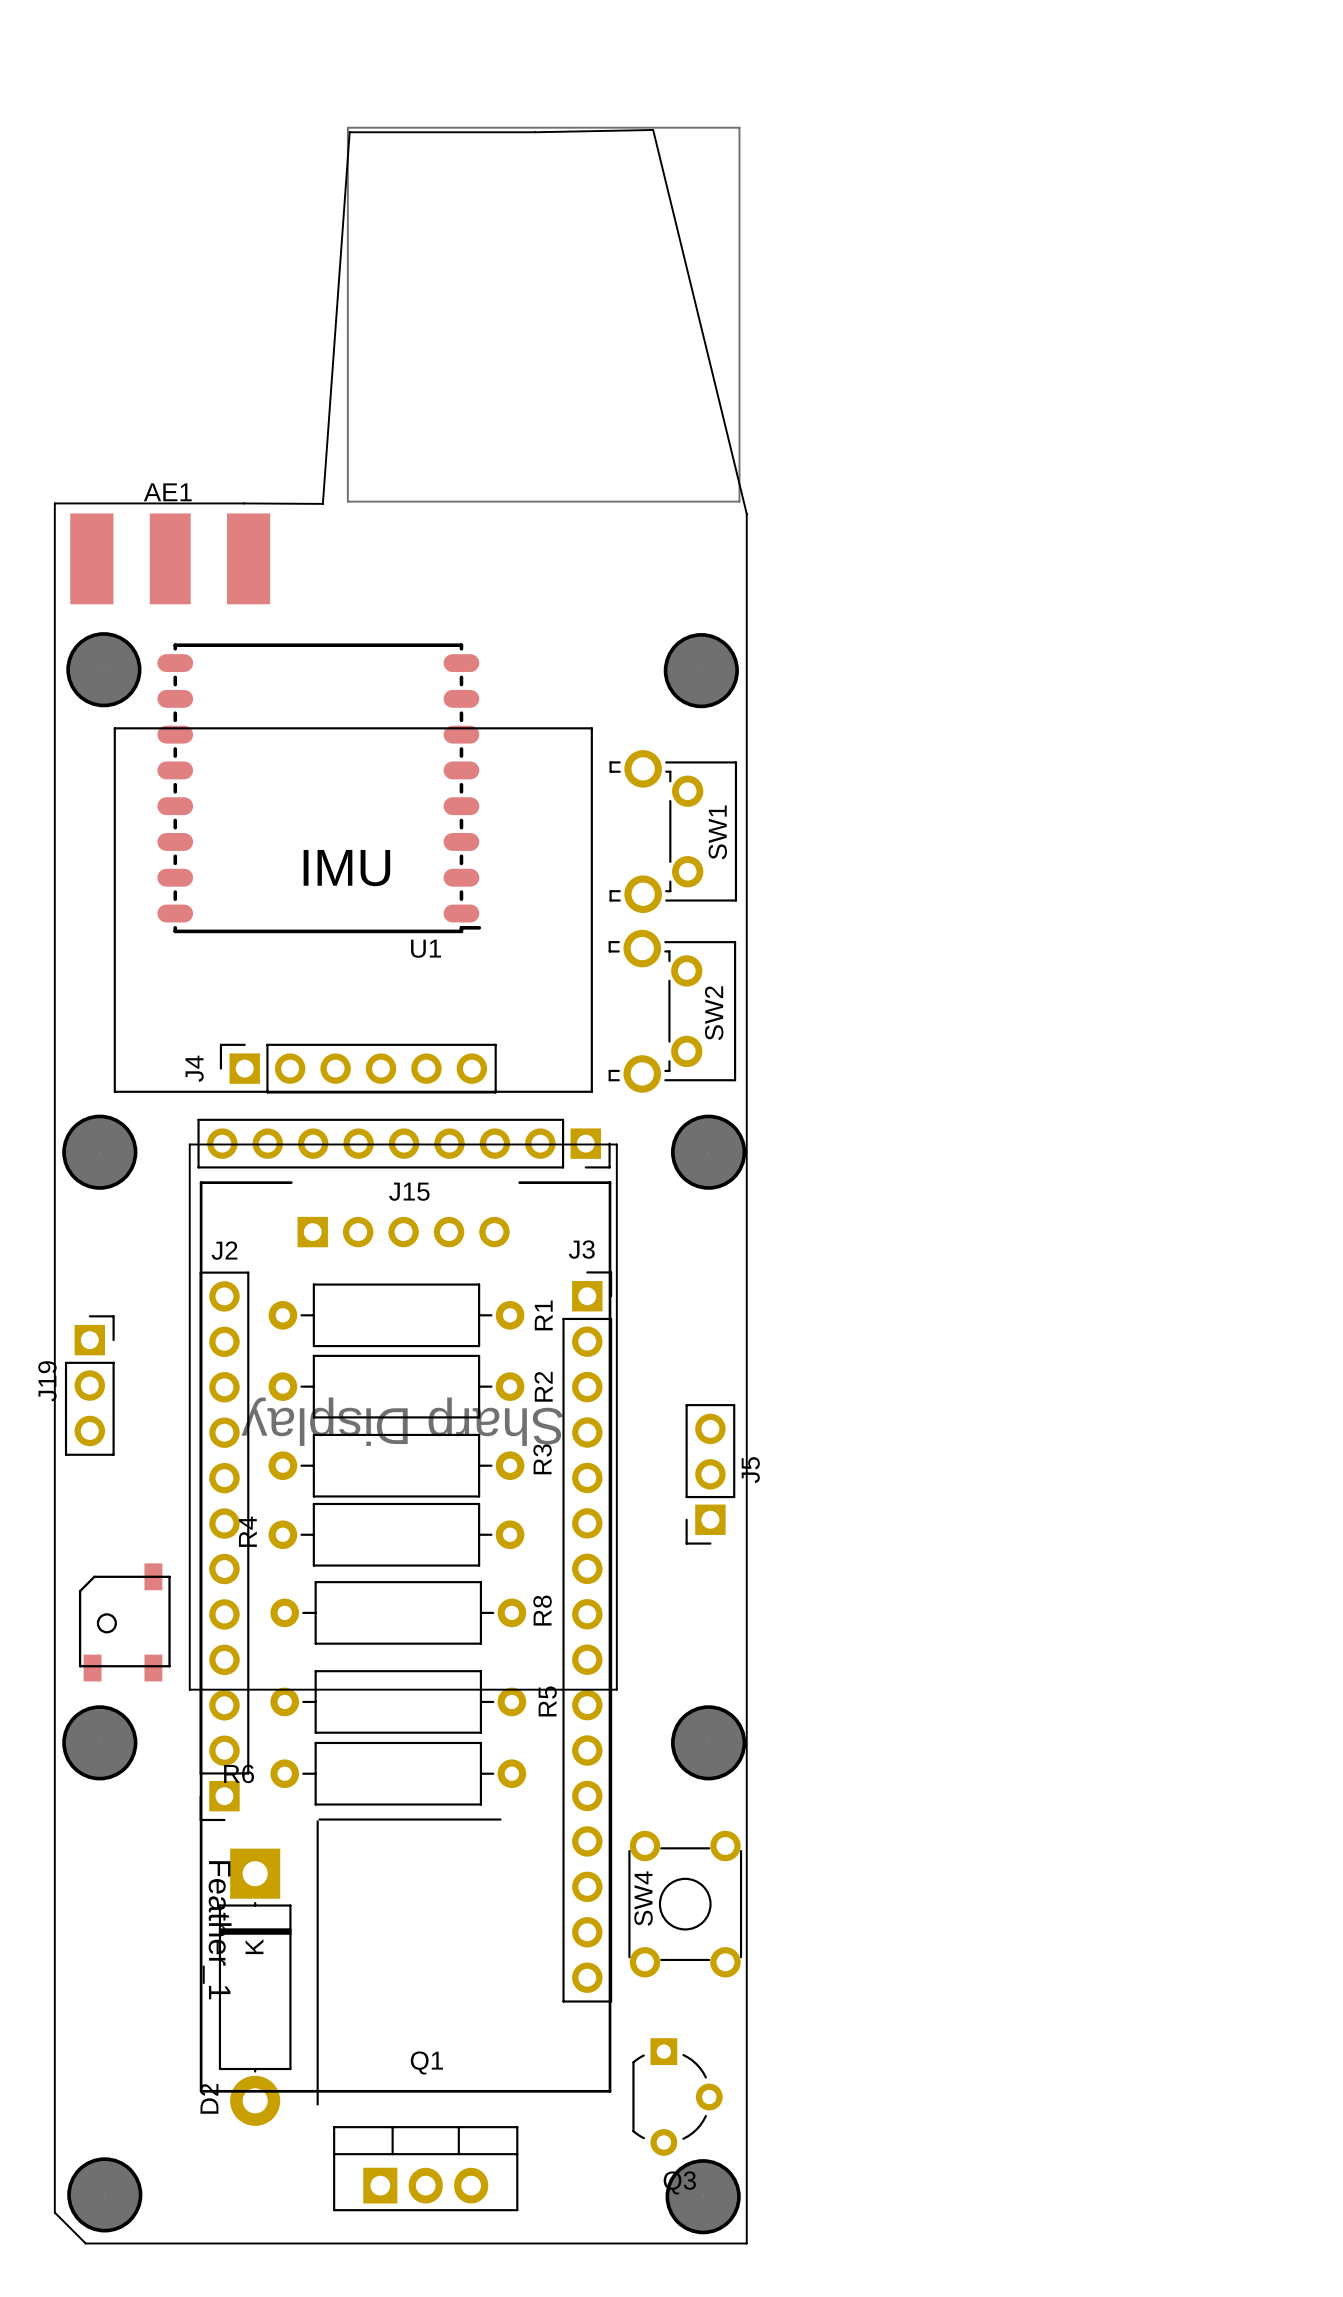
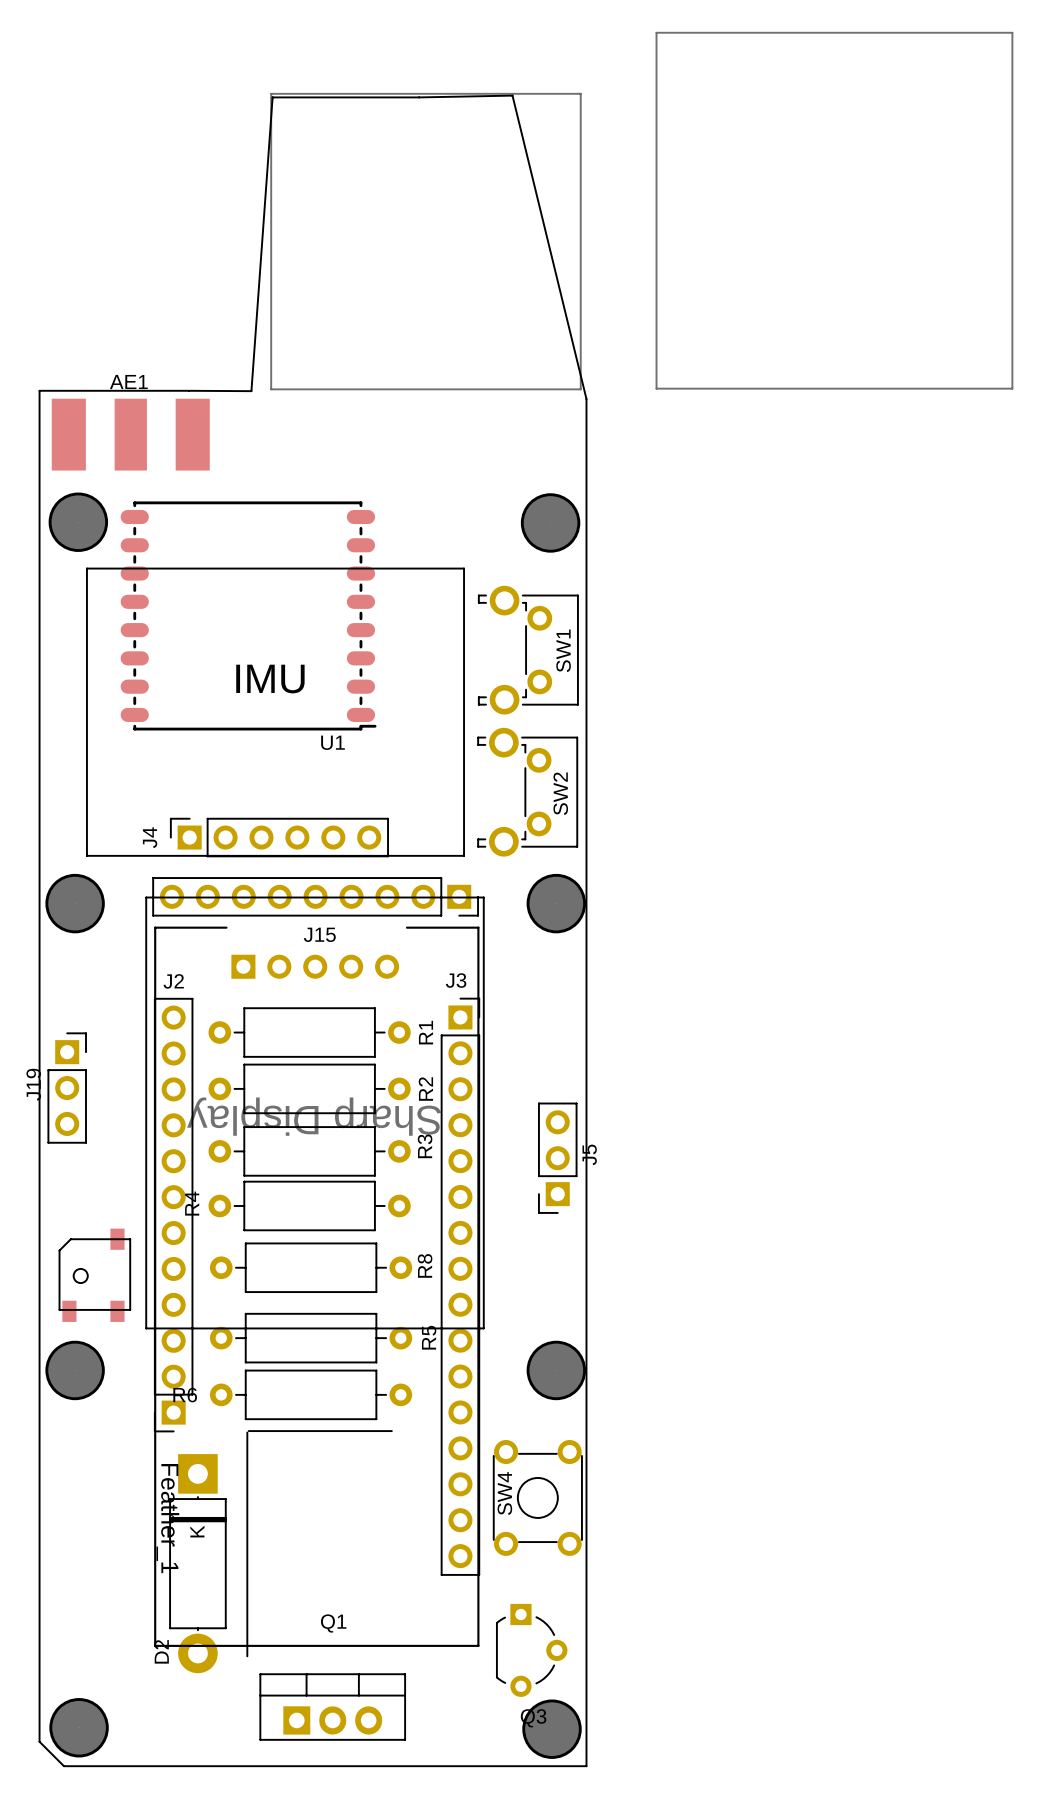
line: none -> (656, 32) (1012, 32) (1012, 388) (656, 388) (656, 32)

